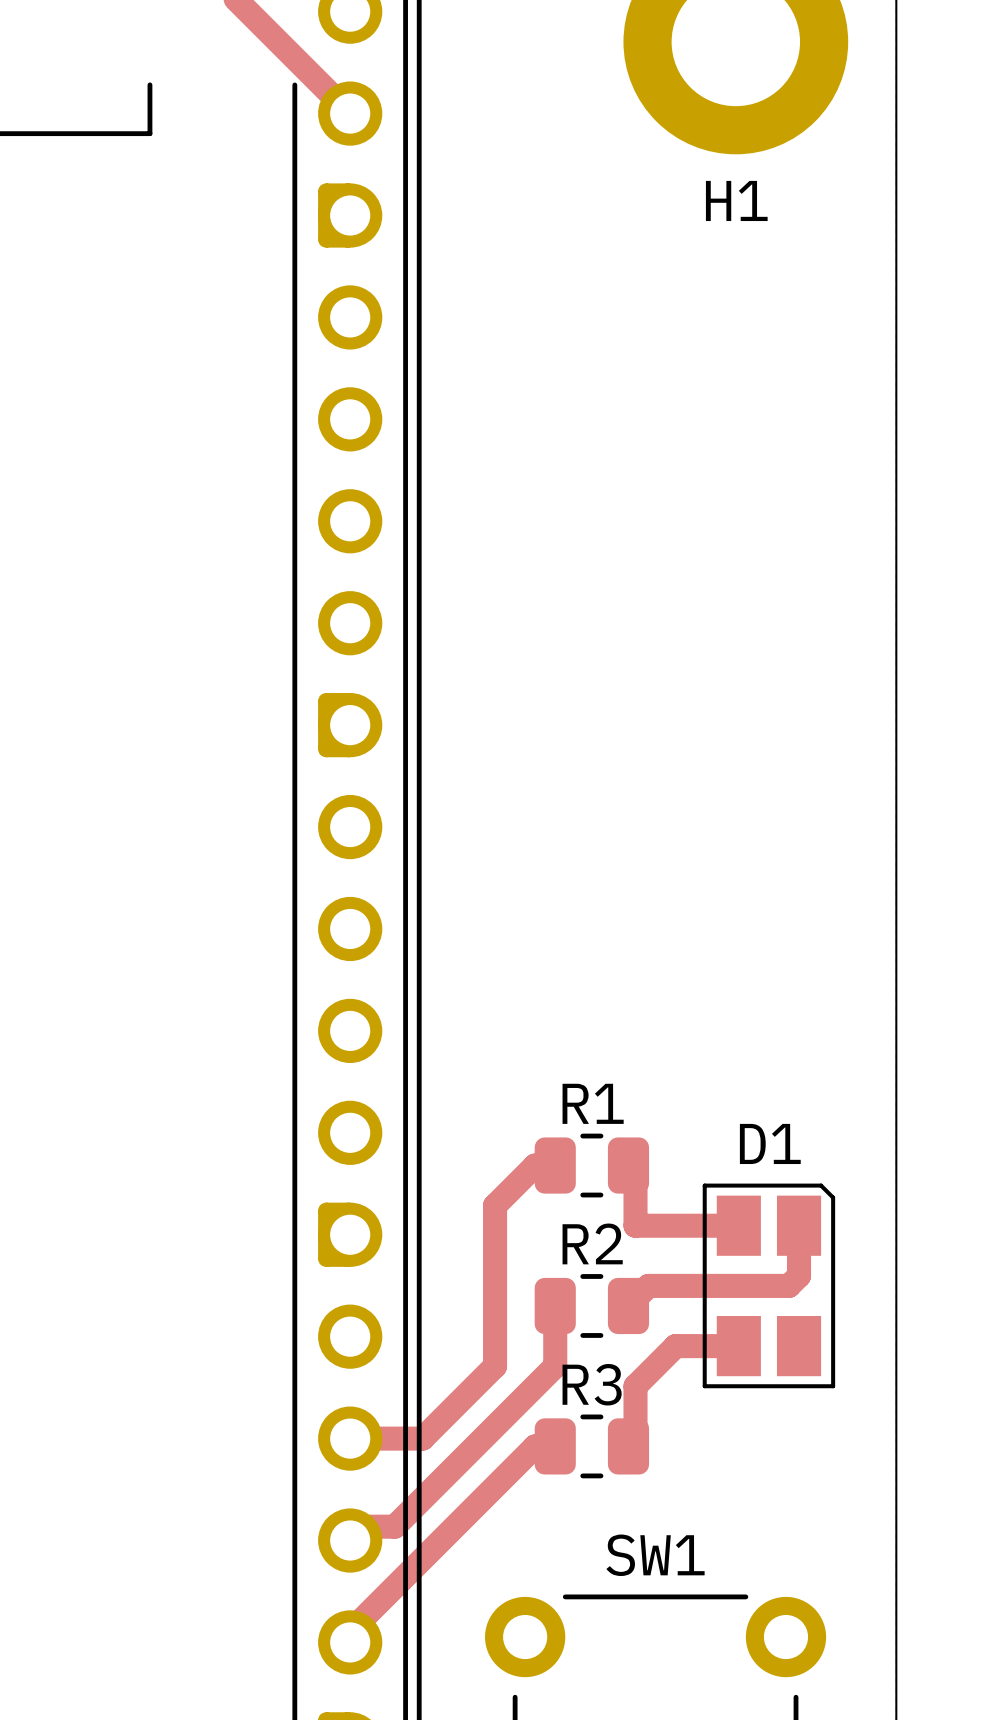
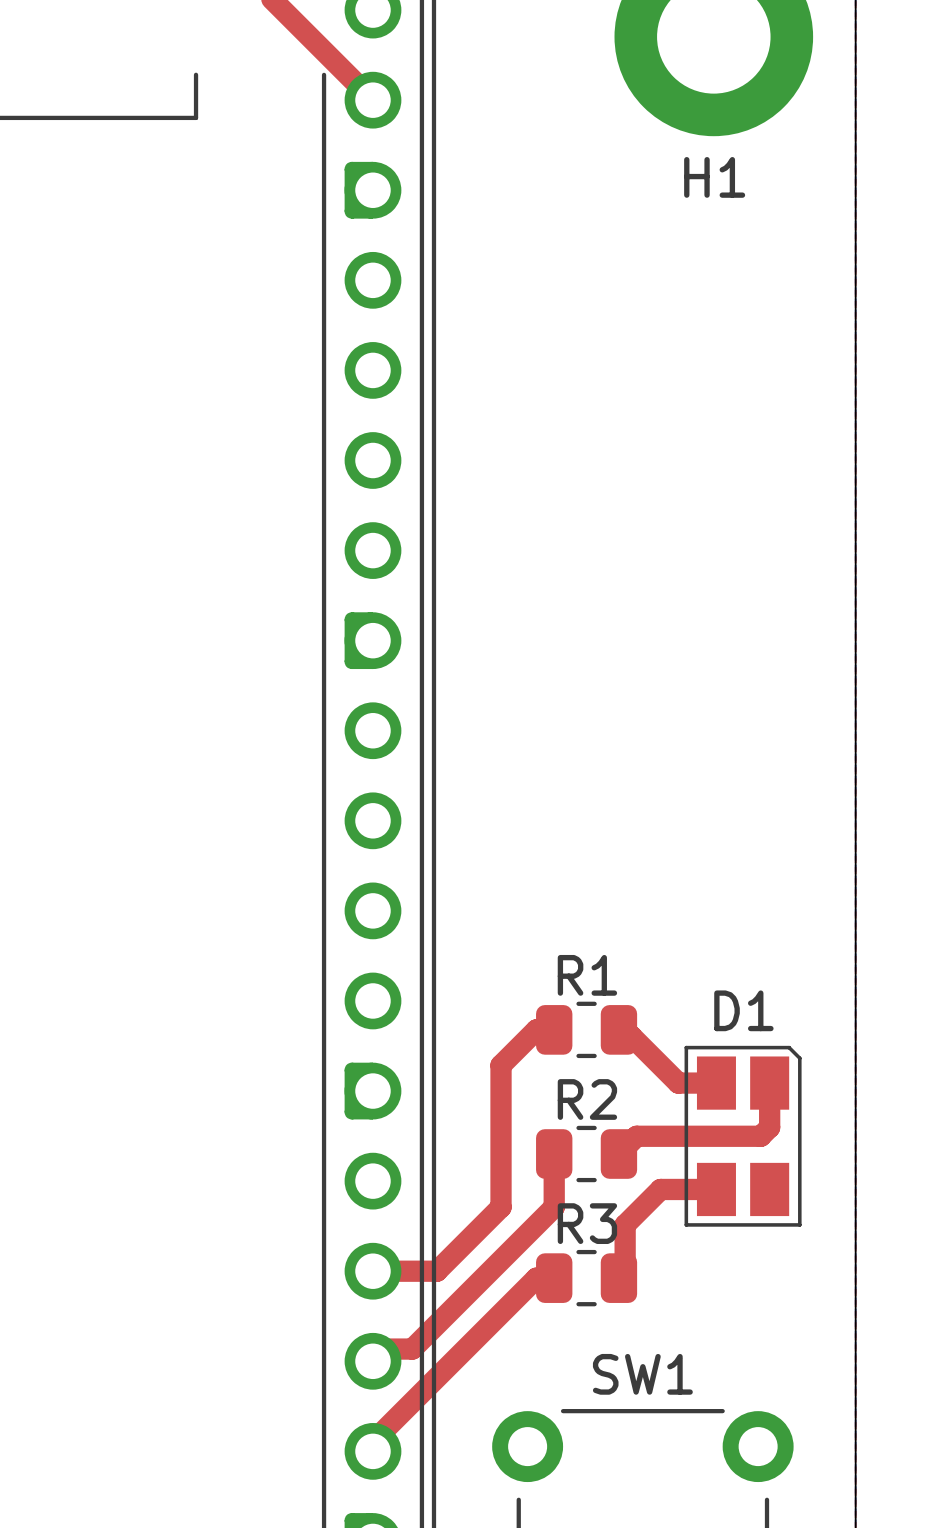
top track: (635, 1172) (635, 1225) (695, 1225) -> (625, 1036) (631, 1036) (678, 1083)

